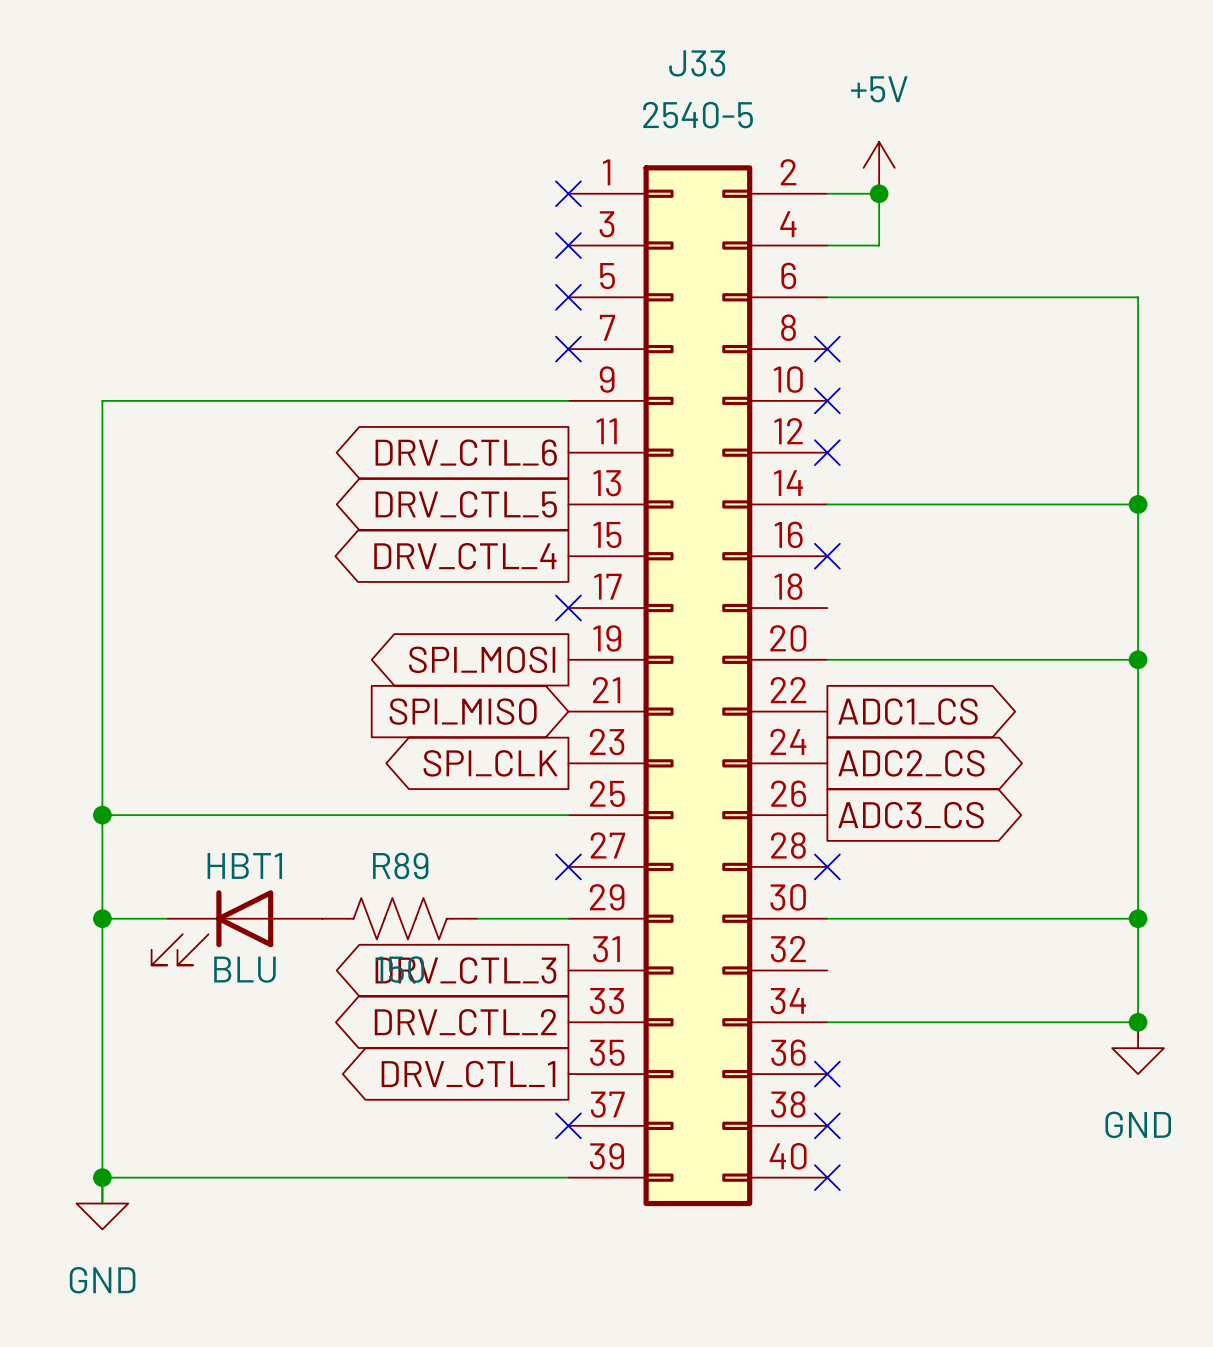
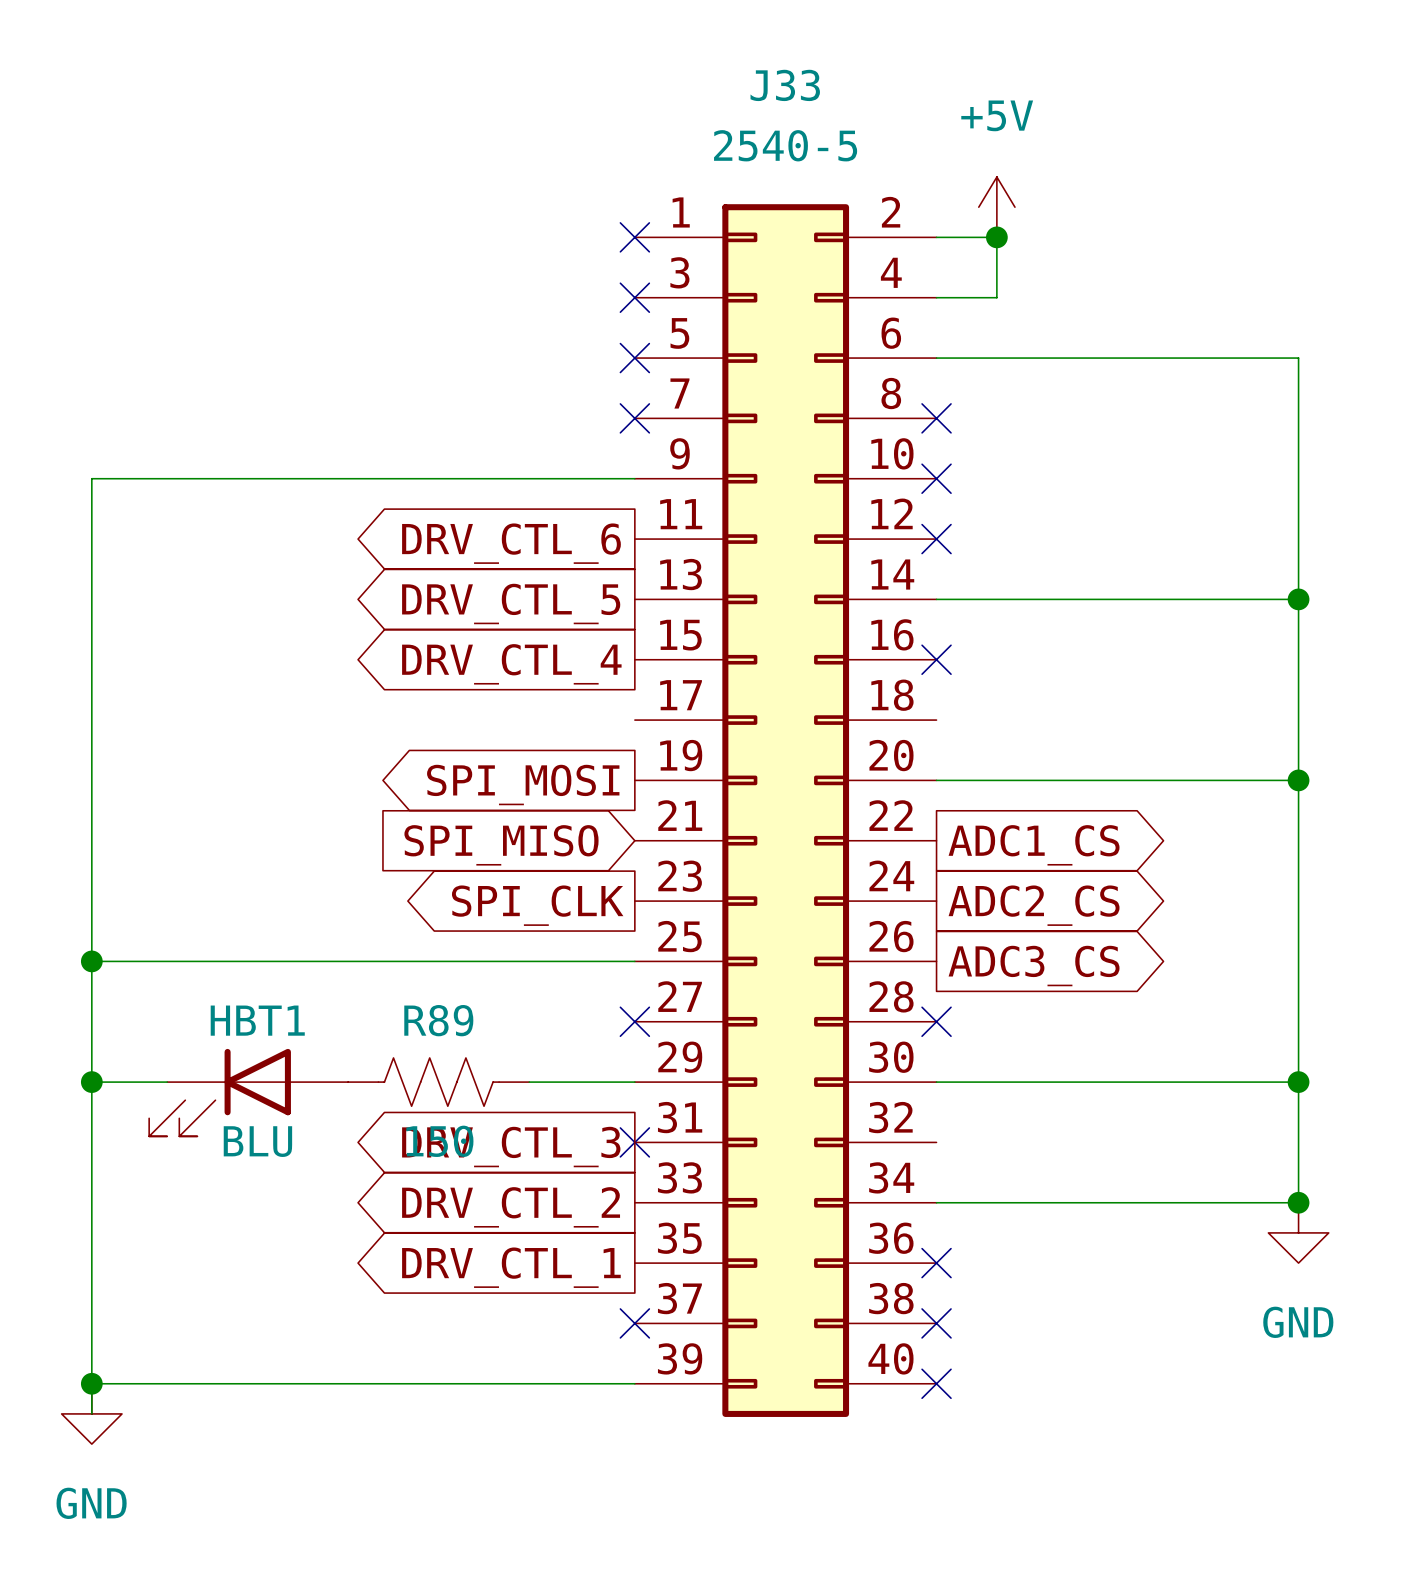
no-connect mark: (568, 608) -> none
no-connect mark: none -> (634, 1142)

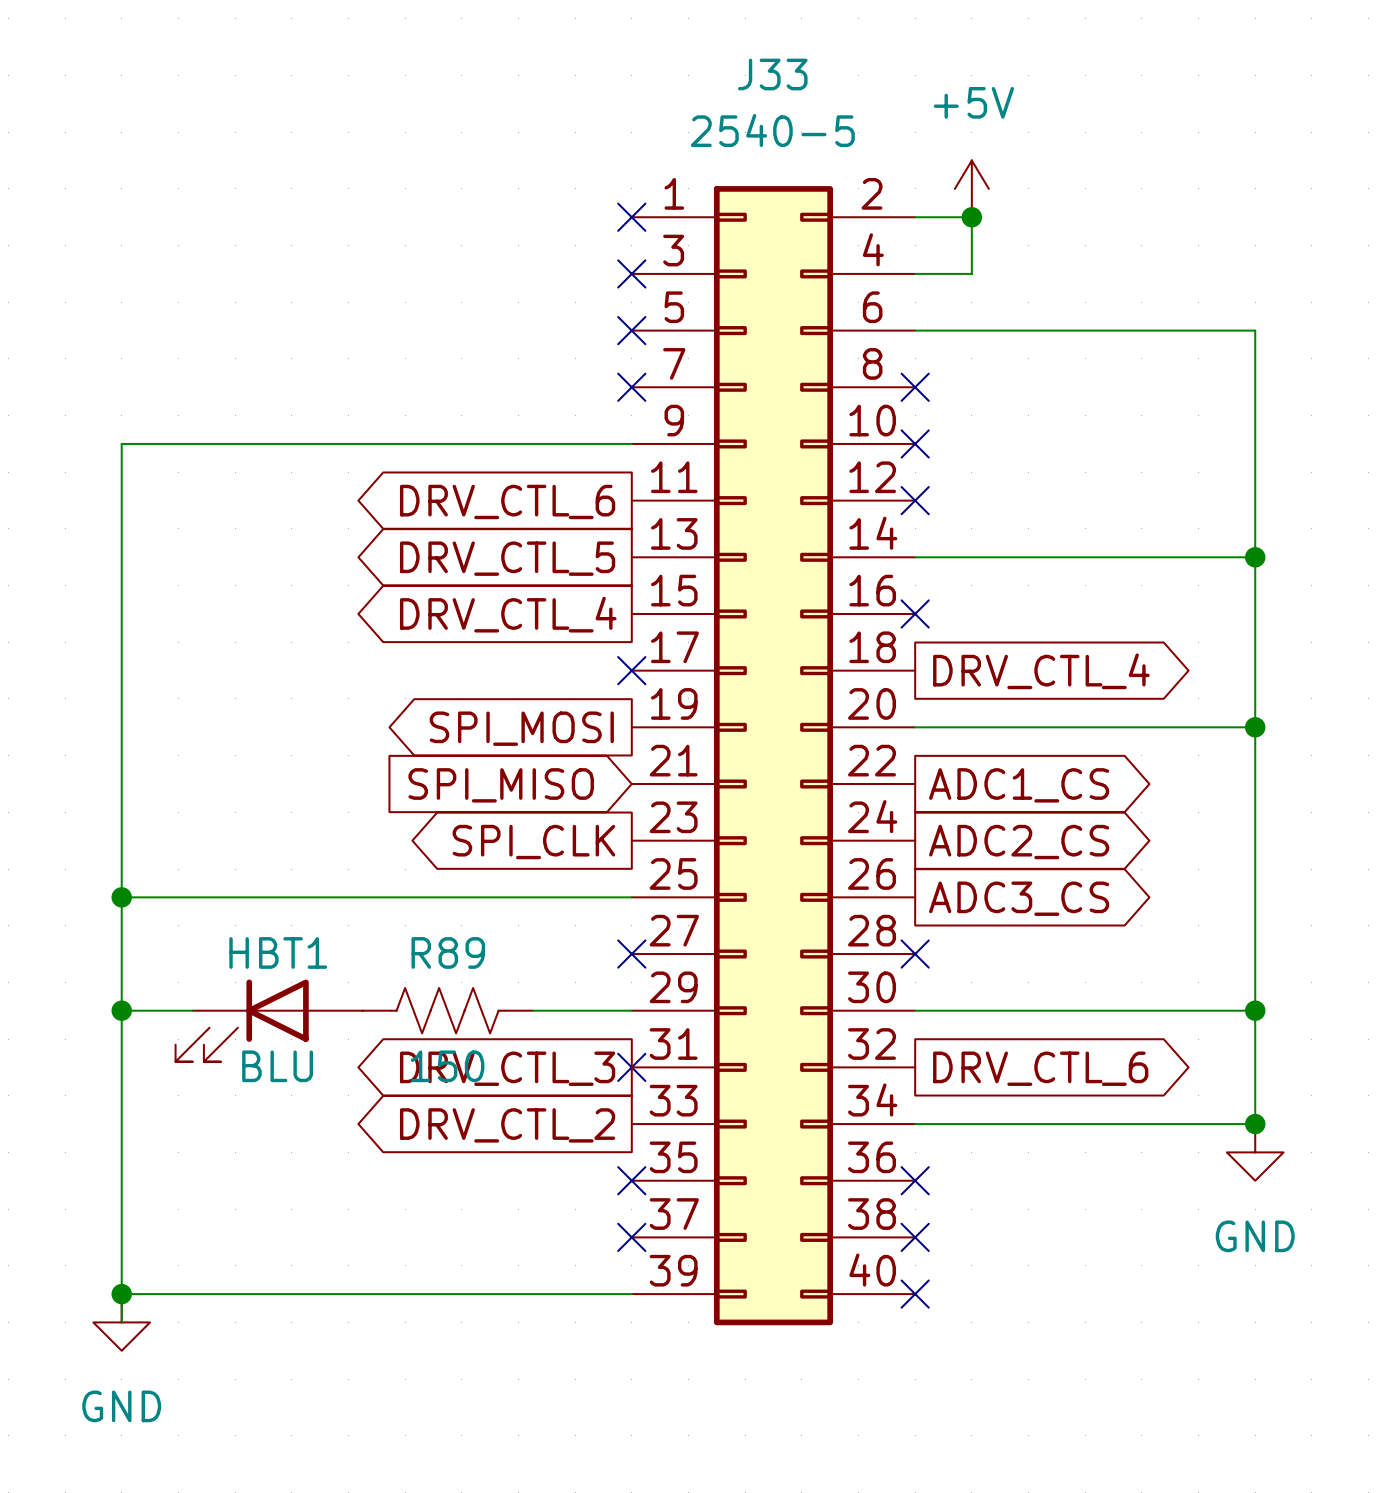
no-connect mark: none -> (631, 670)
global label: none -> DRV_CTL_4 (1041, 671)
global label: none -> DRV_CTL_6 (1040, 1068)
no-connect mark: none -> (631, 1180)
global label: DRV_CTL_1 (511, 1267) -> none

